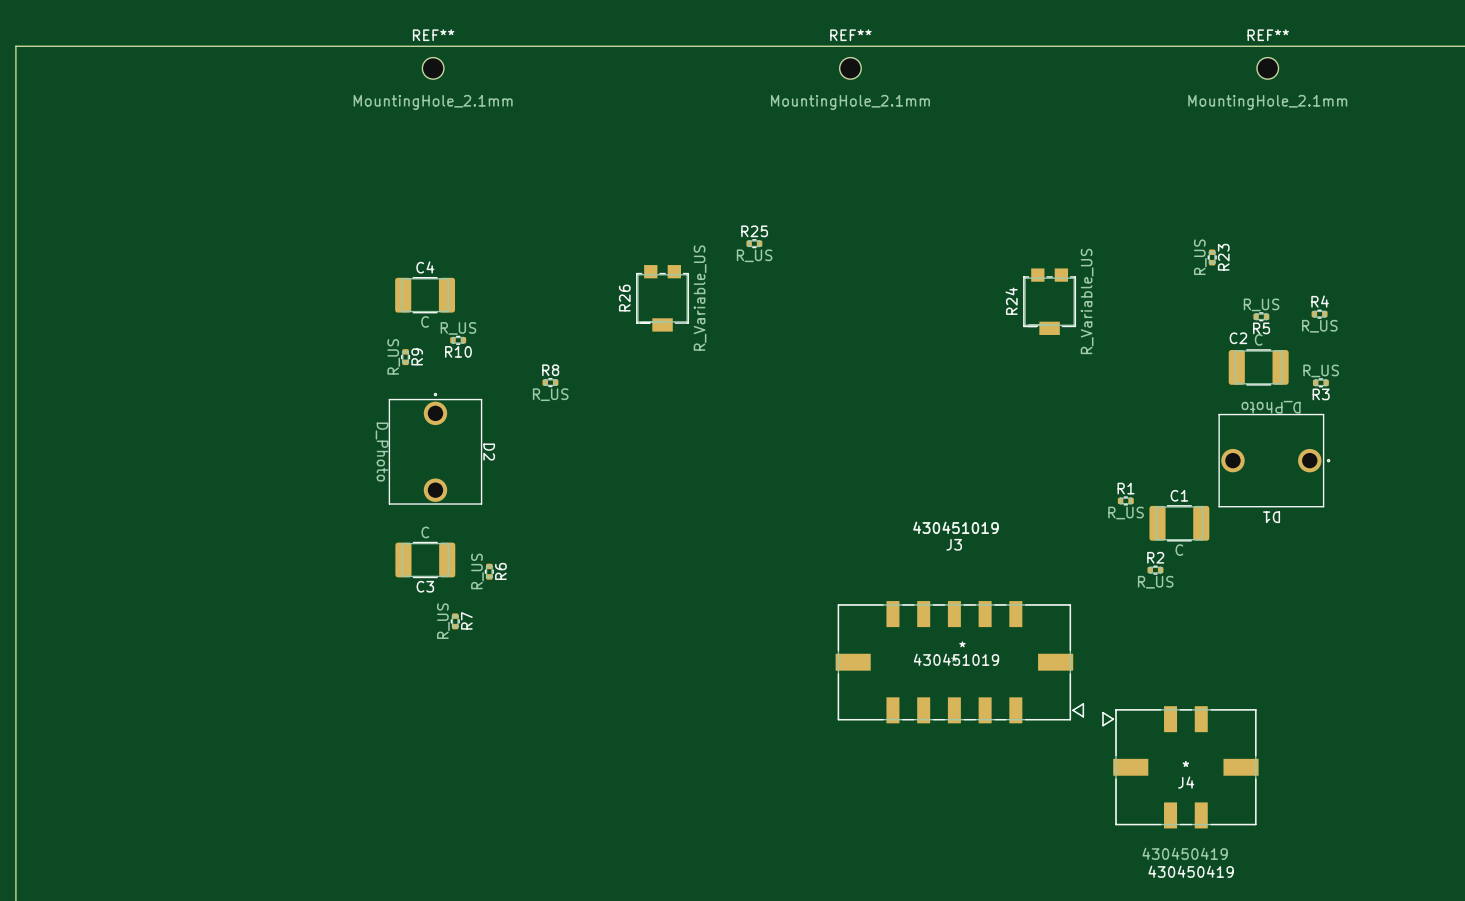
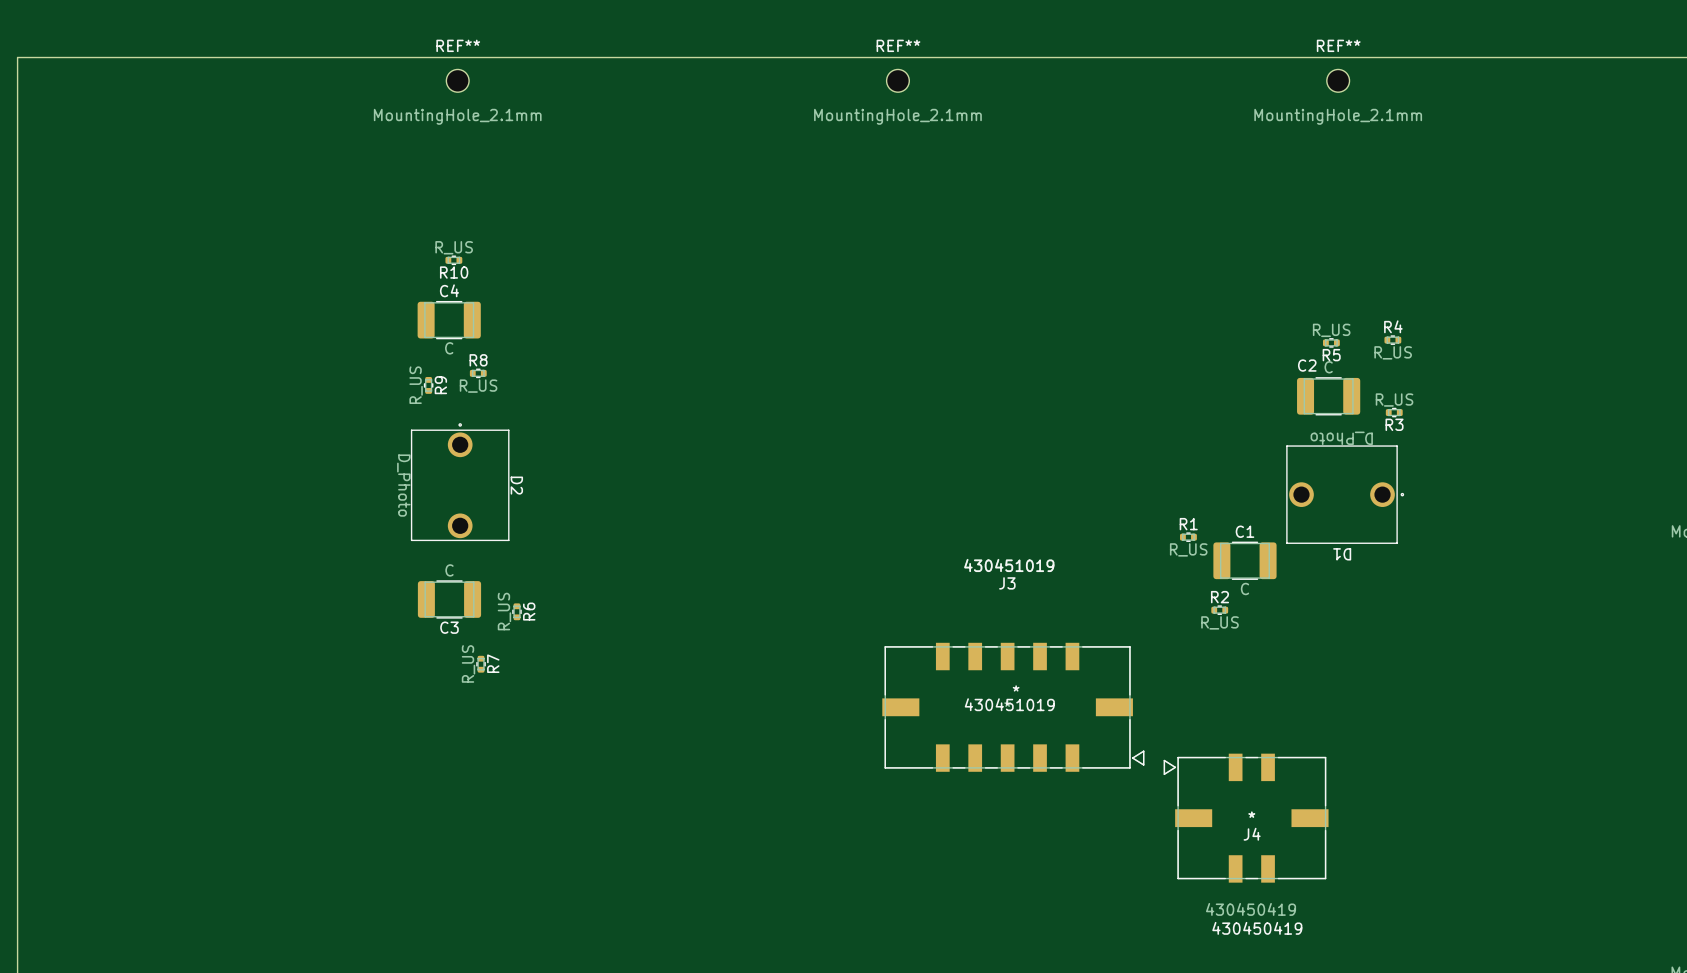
R25: R_US (754, 243) -> none
R23: R_US (1212, 257) -> none
R26: R_Variable_US (662, 298) -> none
R24: R_Variable_US (1049, 301) -> none
R10 position: (458, 340) -> (453, 260)
R8 position: (550, 382) -> (478, 373)

